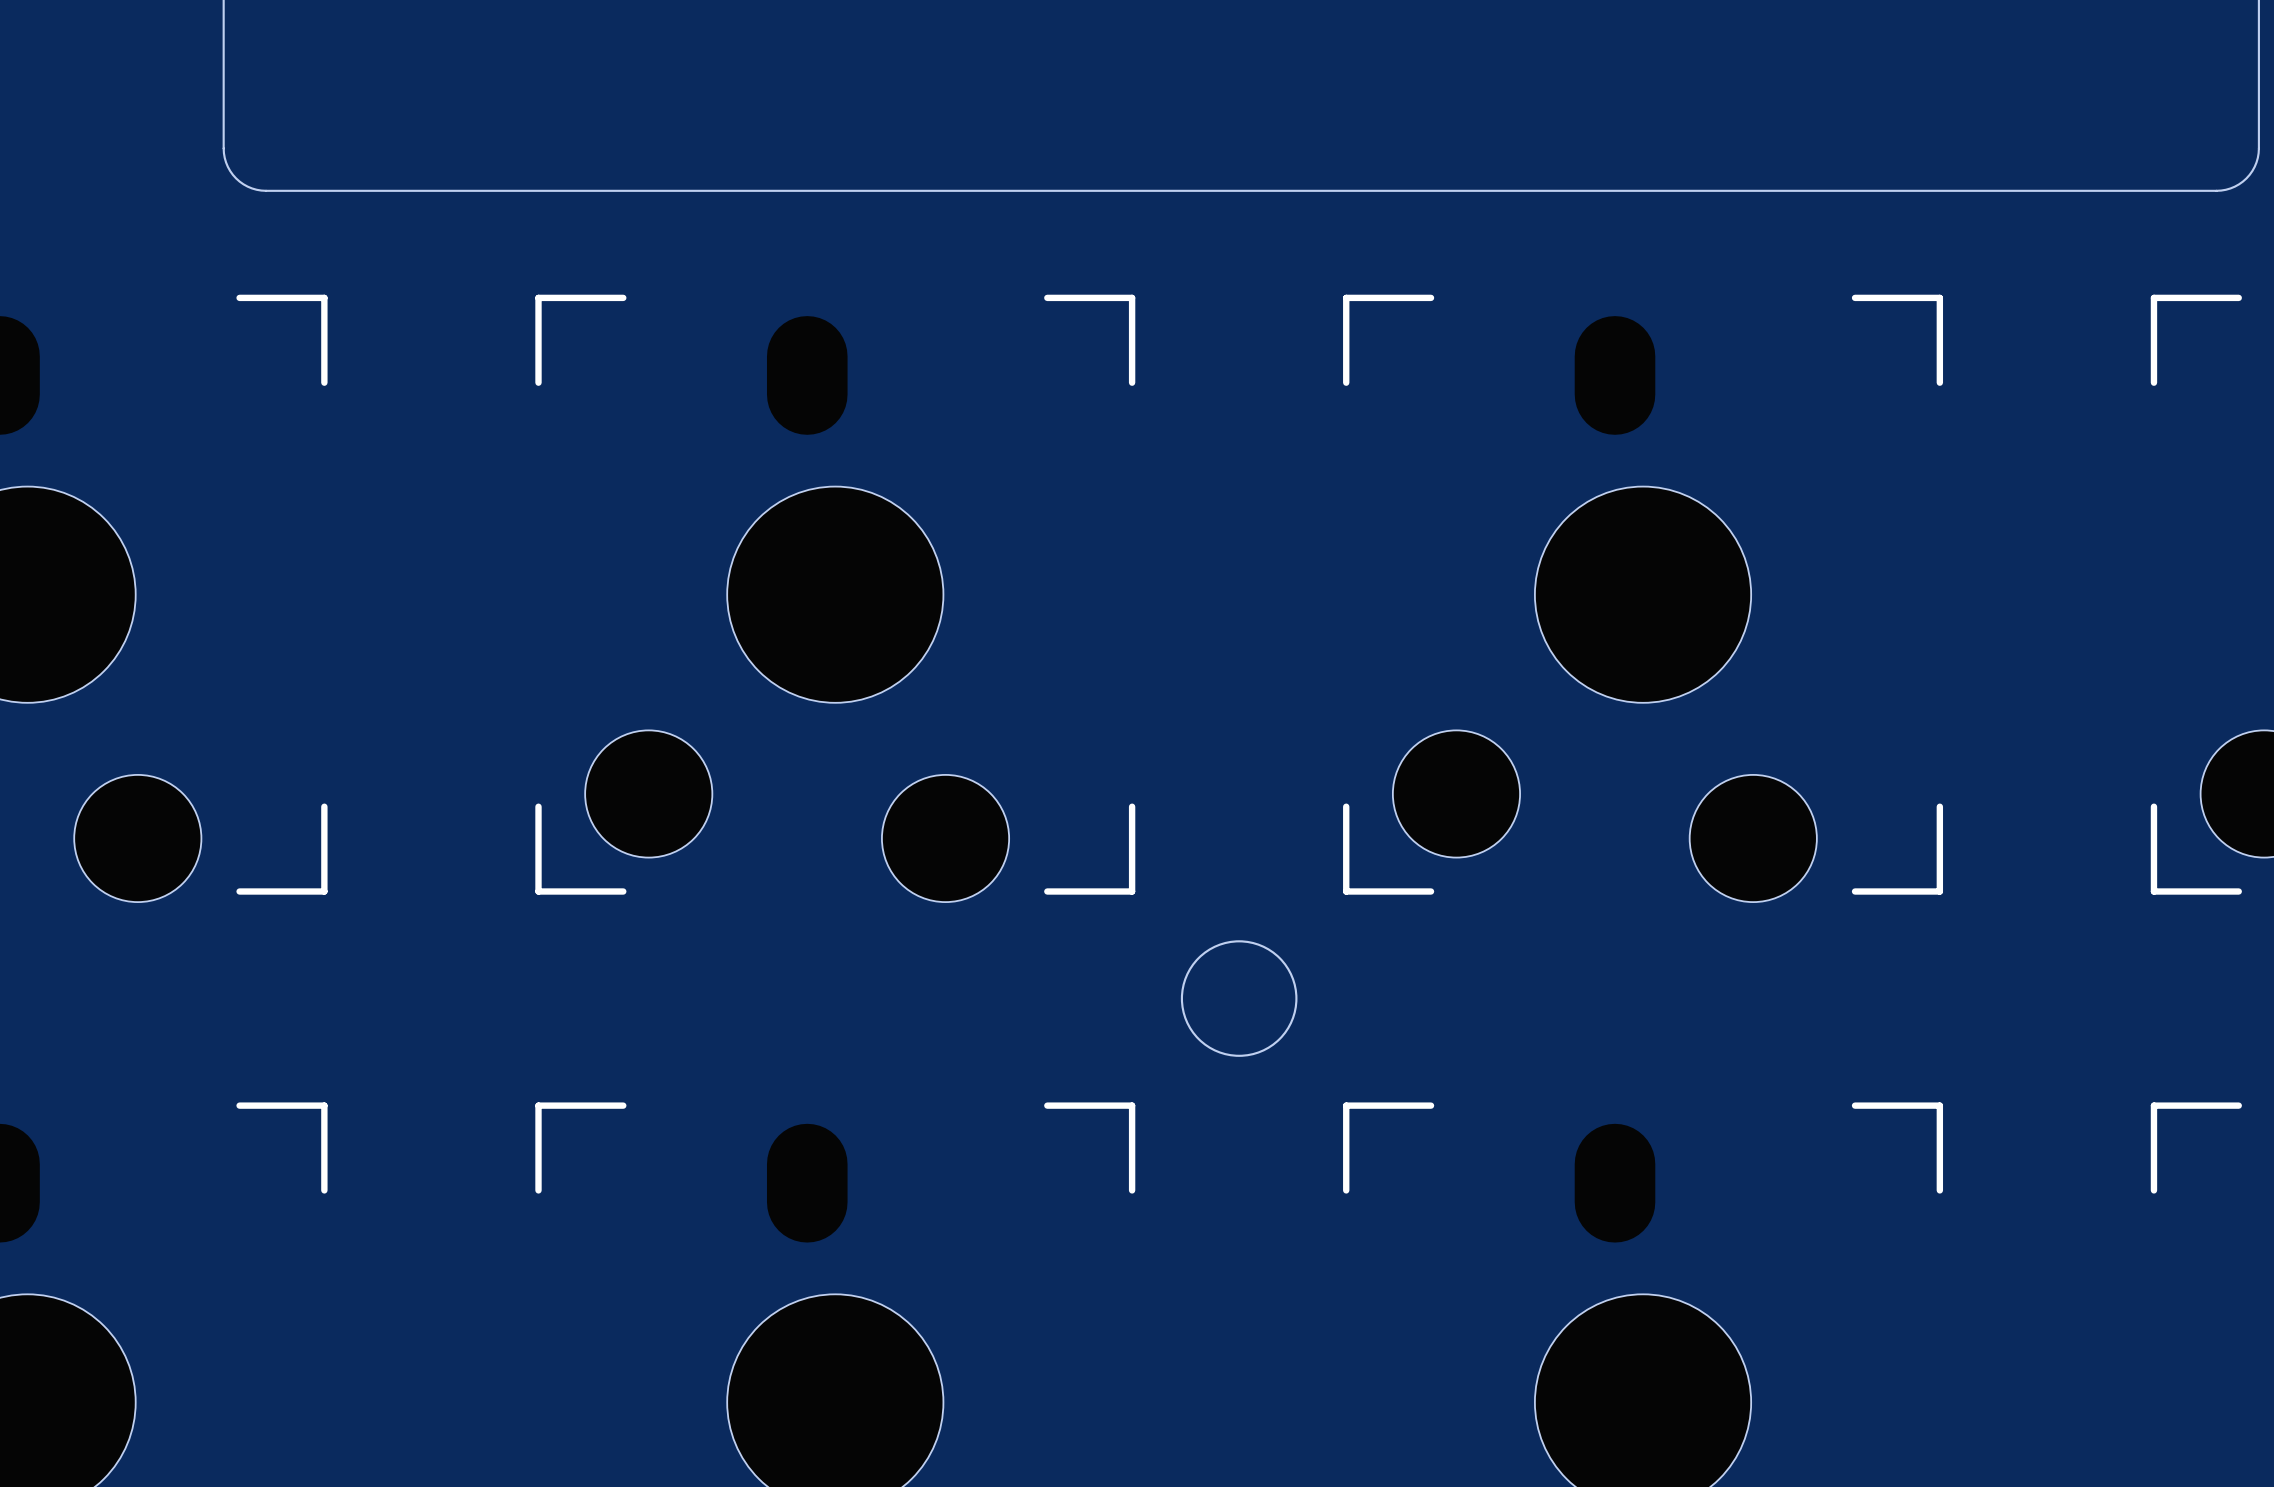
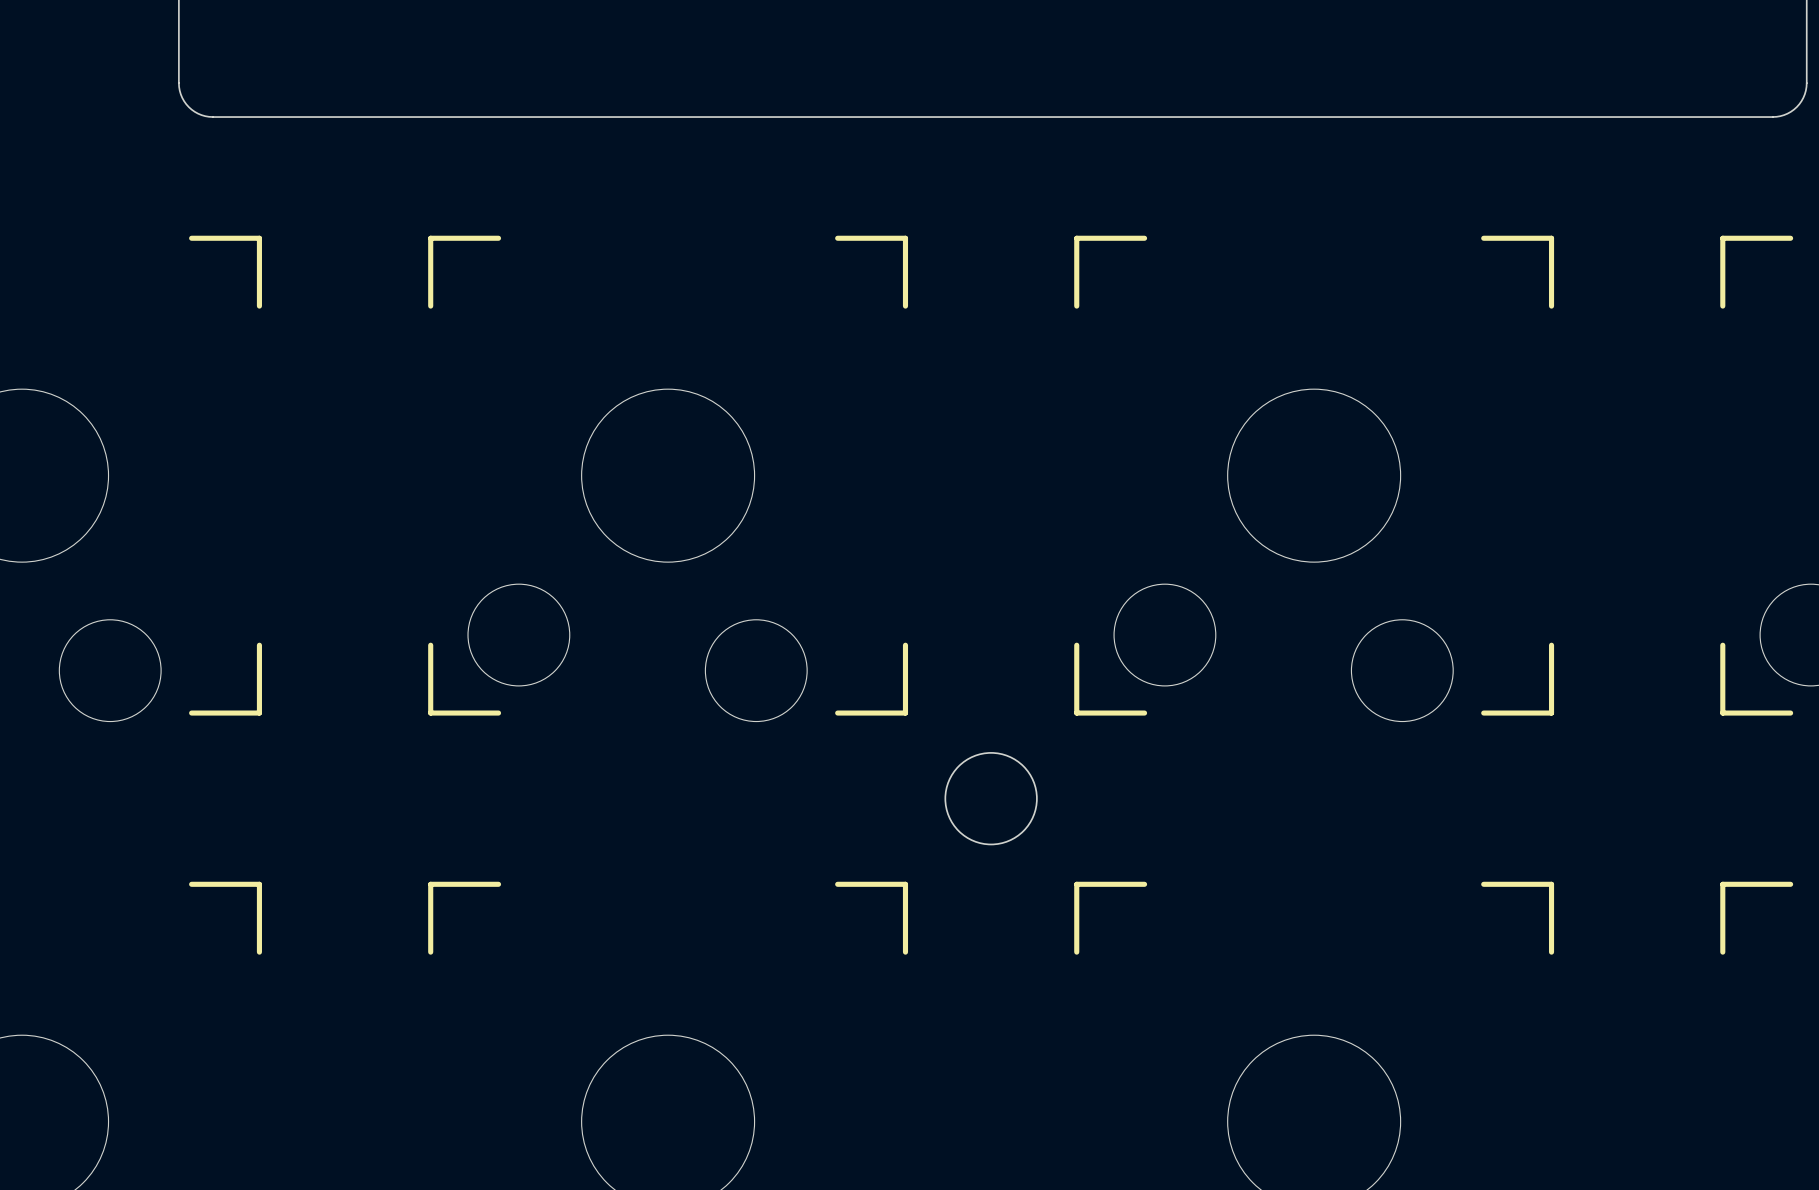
board edge: (223, 103) (223, 153) (227, 166) (236, 178) (243, 184) (252, 188) (266, 190) (2216, 190) (2225, 189) (2239, 184) (2249, 174) (2254, 166) (2258, 153) (2258, 103) -> (178, 83) (182, 97) (188, 107) (198, 113) (212, 117) (1772, 117) (1784, 115) (1796, 107) (1804, 94) (1806, 83)

